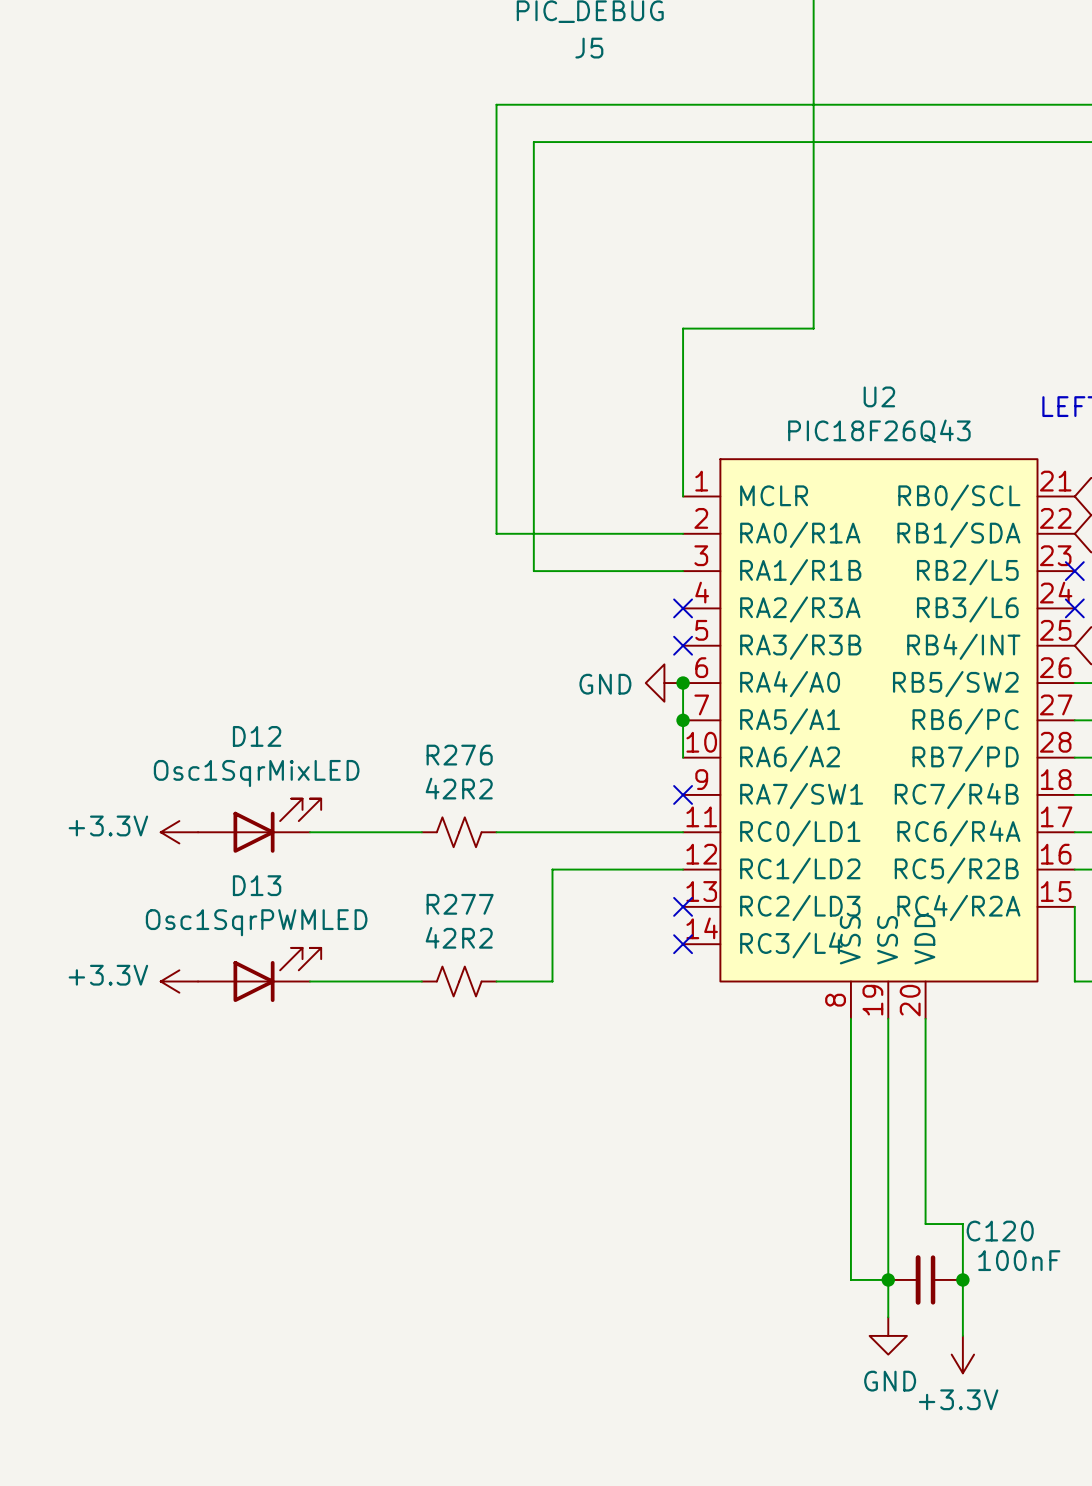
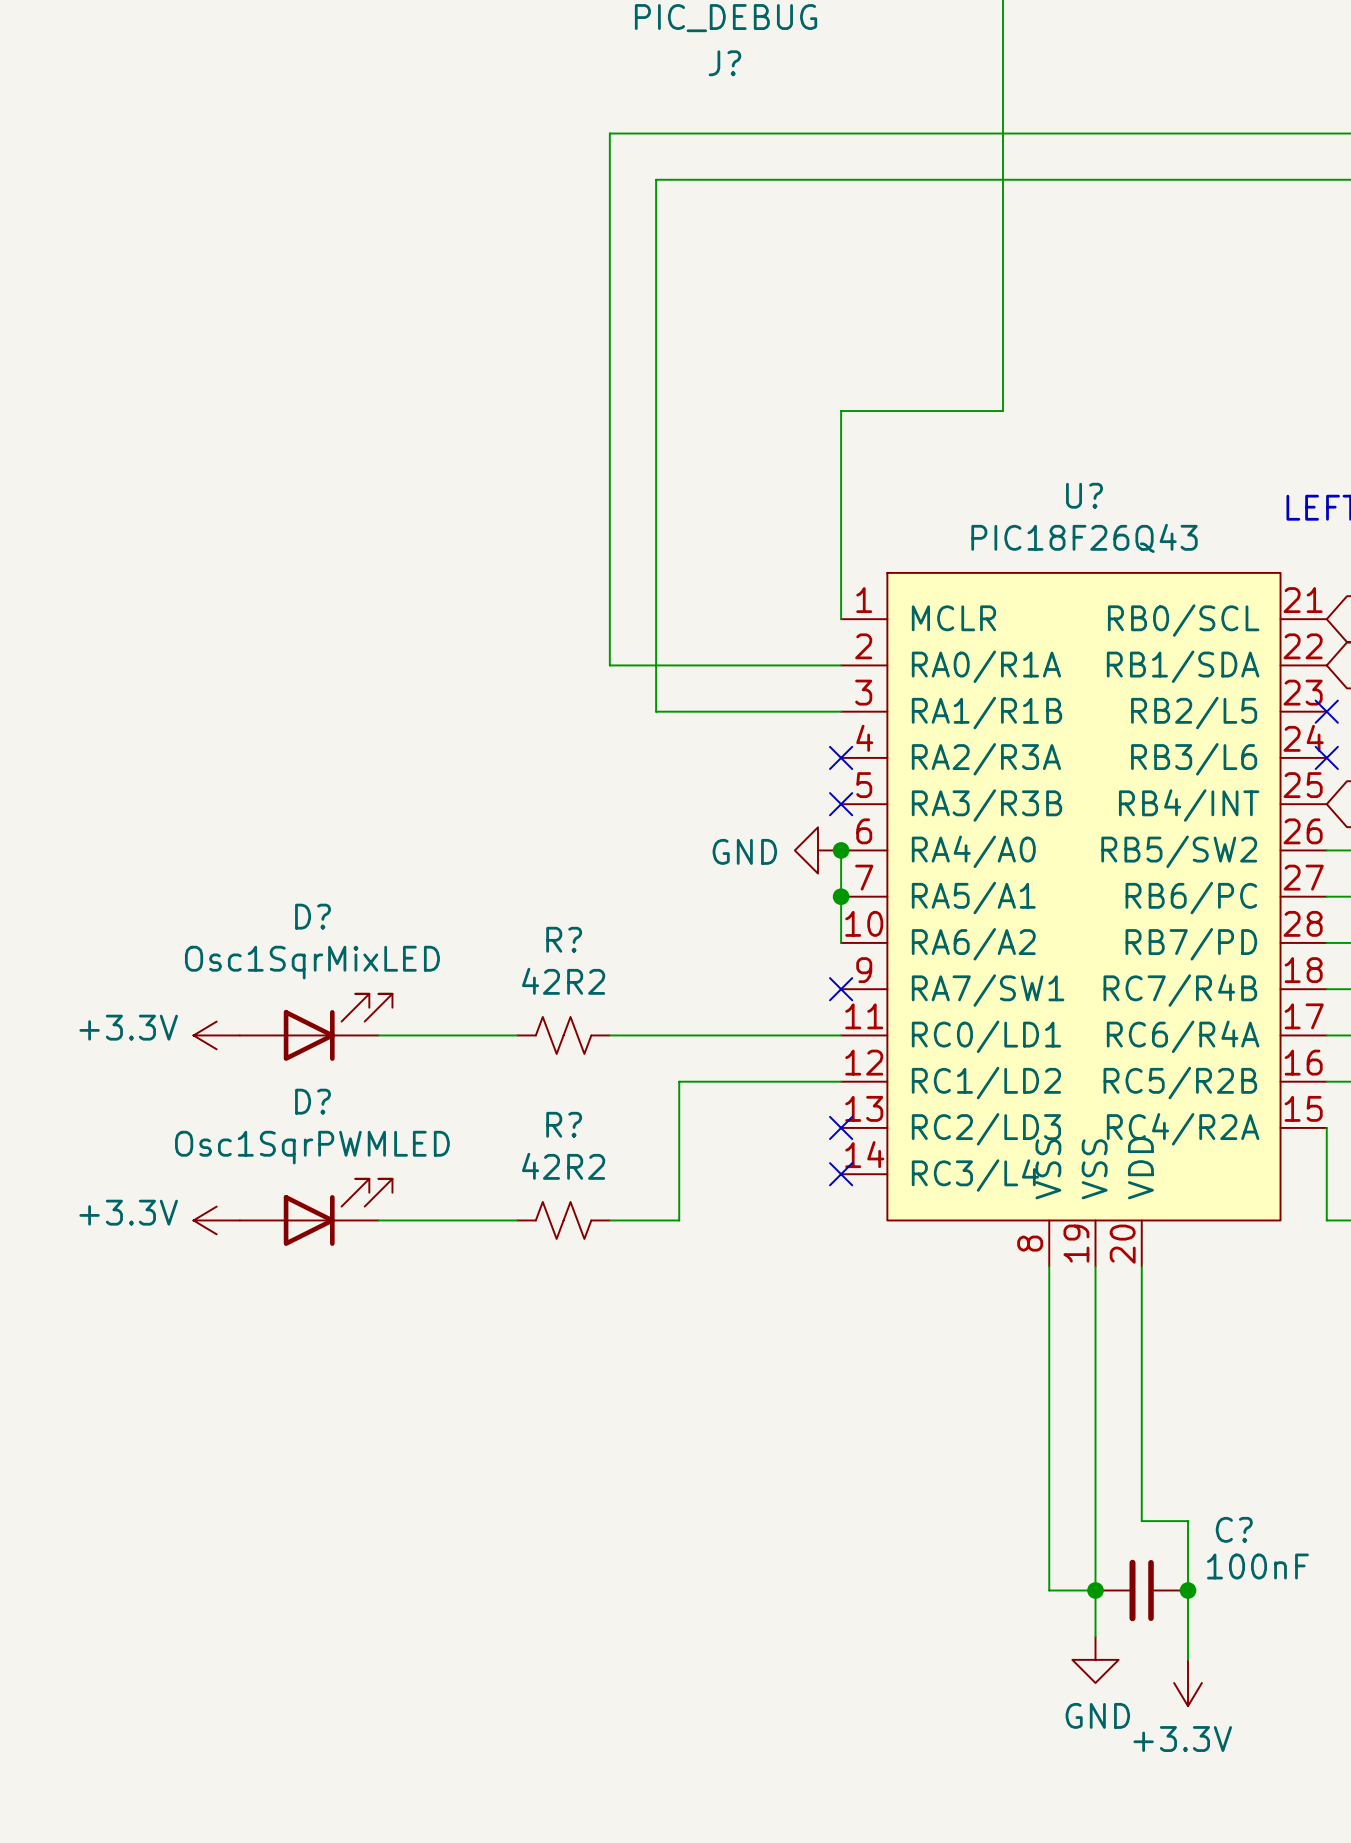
J5 name: J5 (589, 48) -> J? (724, 63)
U2 name: U2 (879, 396) -> U? (1084, 495)
D12 name: D12 (257, 736) -> D? (312, 916)
R276 name: R276 (459, 755) -> R? (564, 939)
D13 name: D13 (257, 885) -> D? (312, 1101)
R277 name: R277 (460, 904) -> R? (564, 1124)
C120 name: C120 (1000, 1231) -> C? (1234, 1529)

